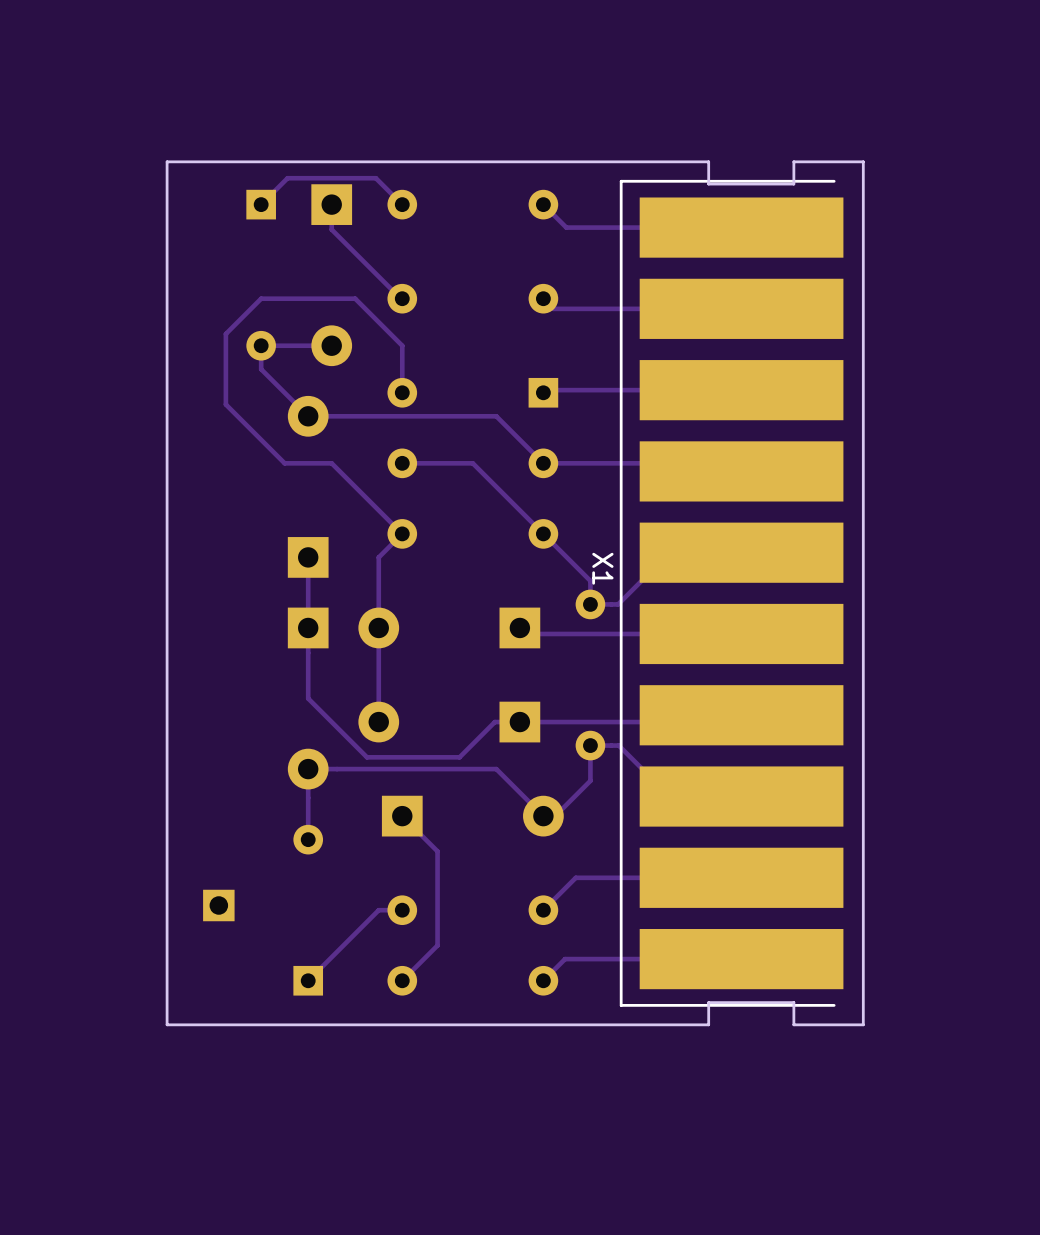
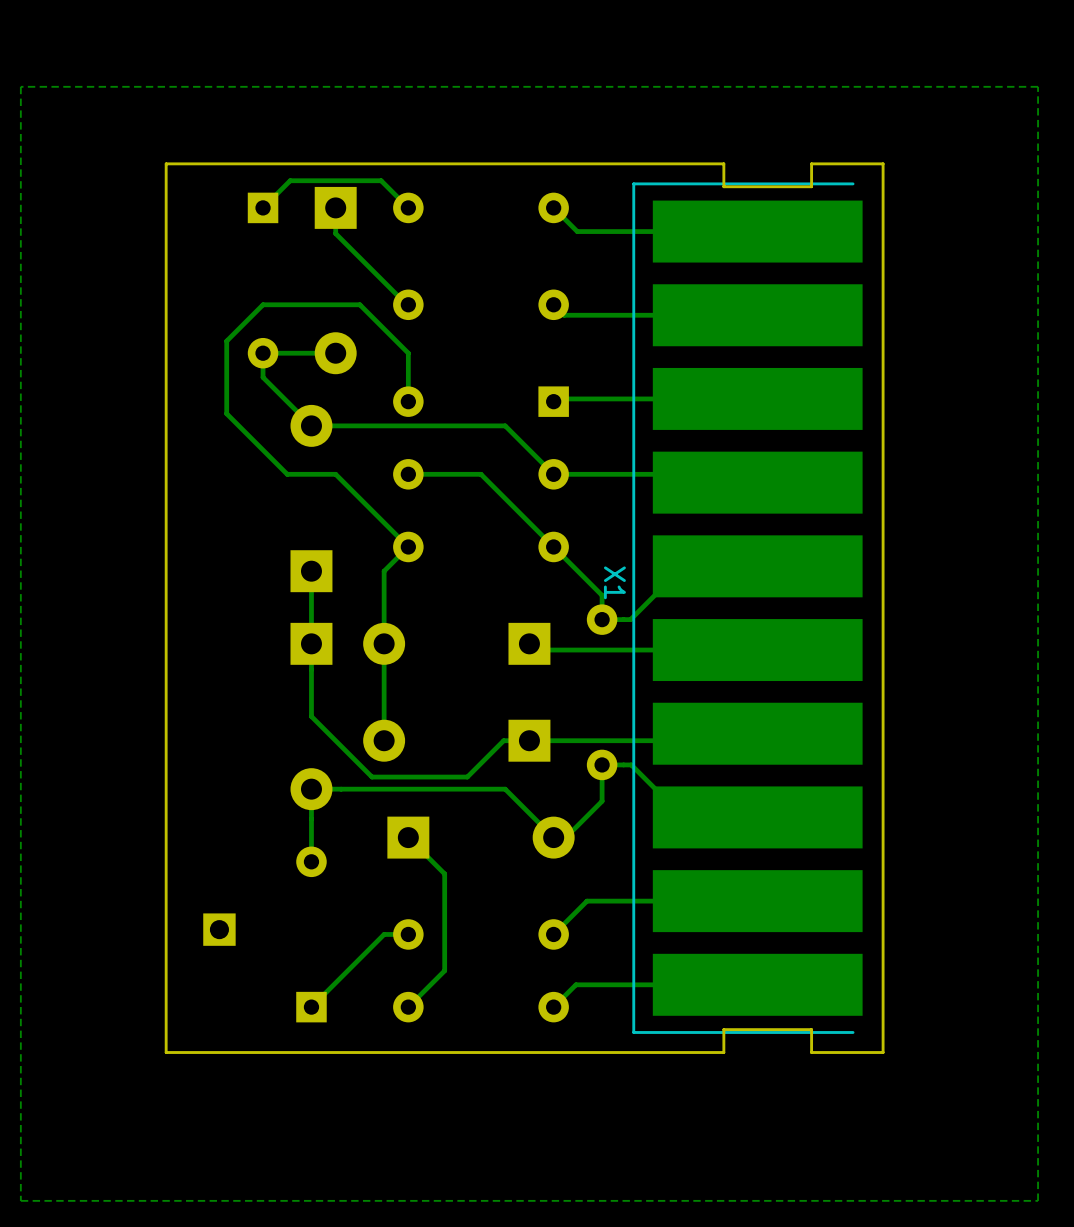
zone outline: none -> (1038, 86) (20, 86) (20, 1200) (1038, 1200) (1038, 86)

